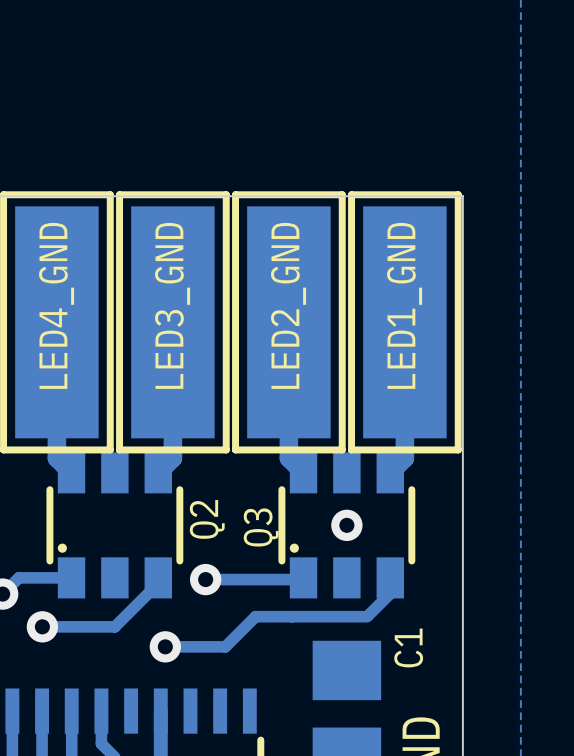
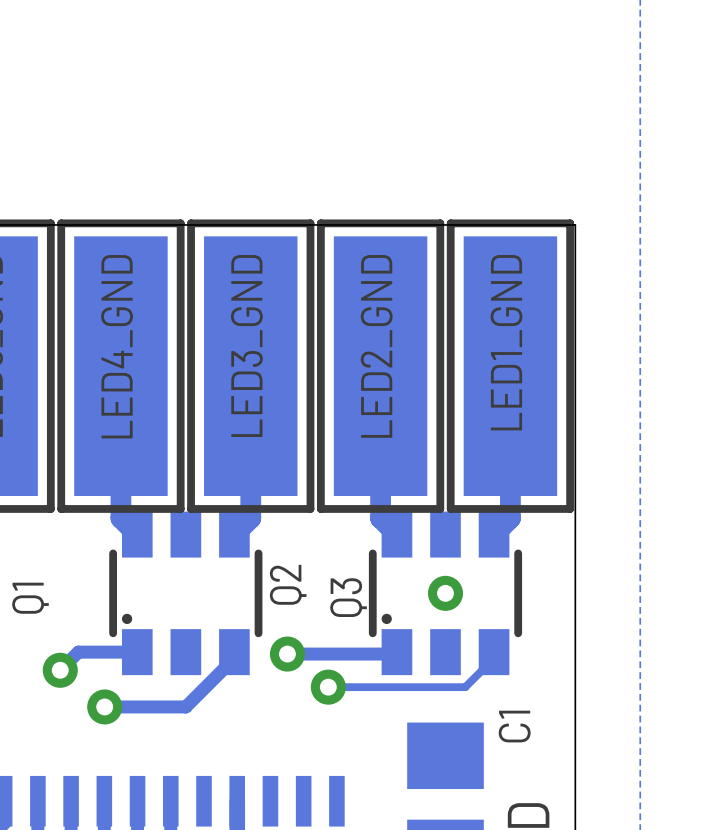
track: (390, 583) (390, 593) (367, 616) (255, 616) (225, 646) (165, 646) -> (494, 658) (465, 687) (328, 687)
via position: (165, 646) -> (328, 687)

